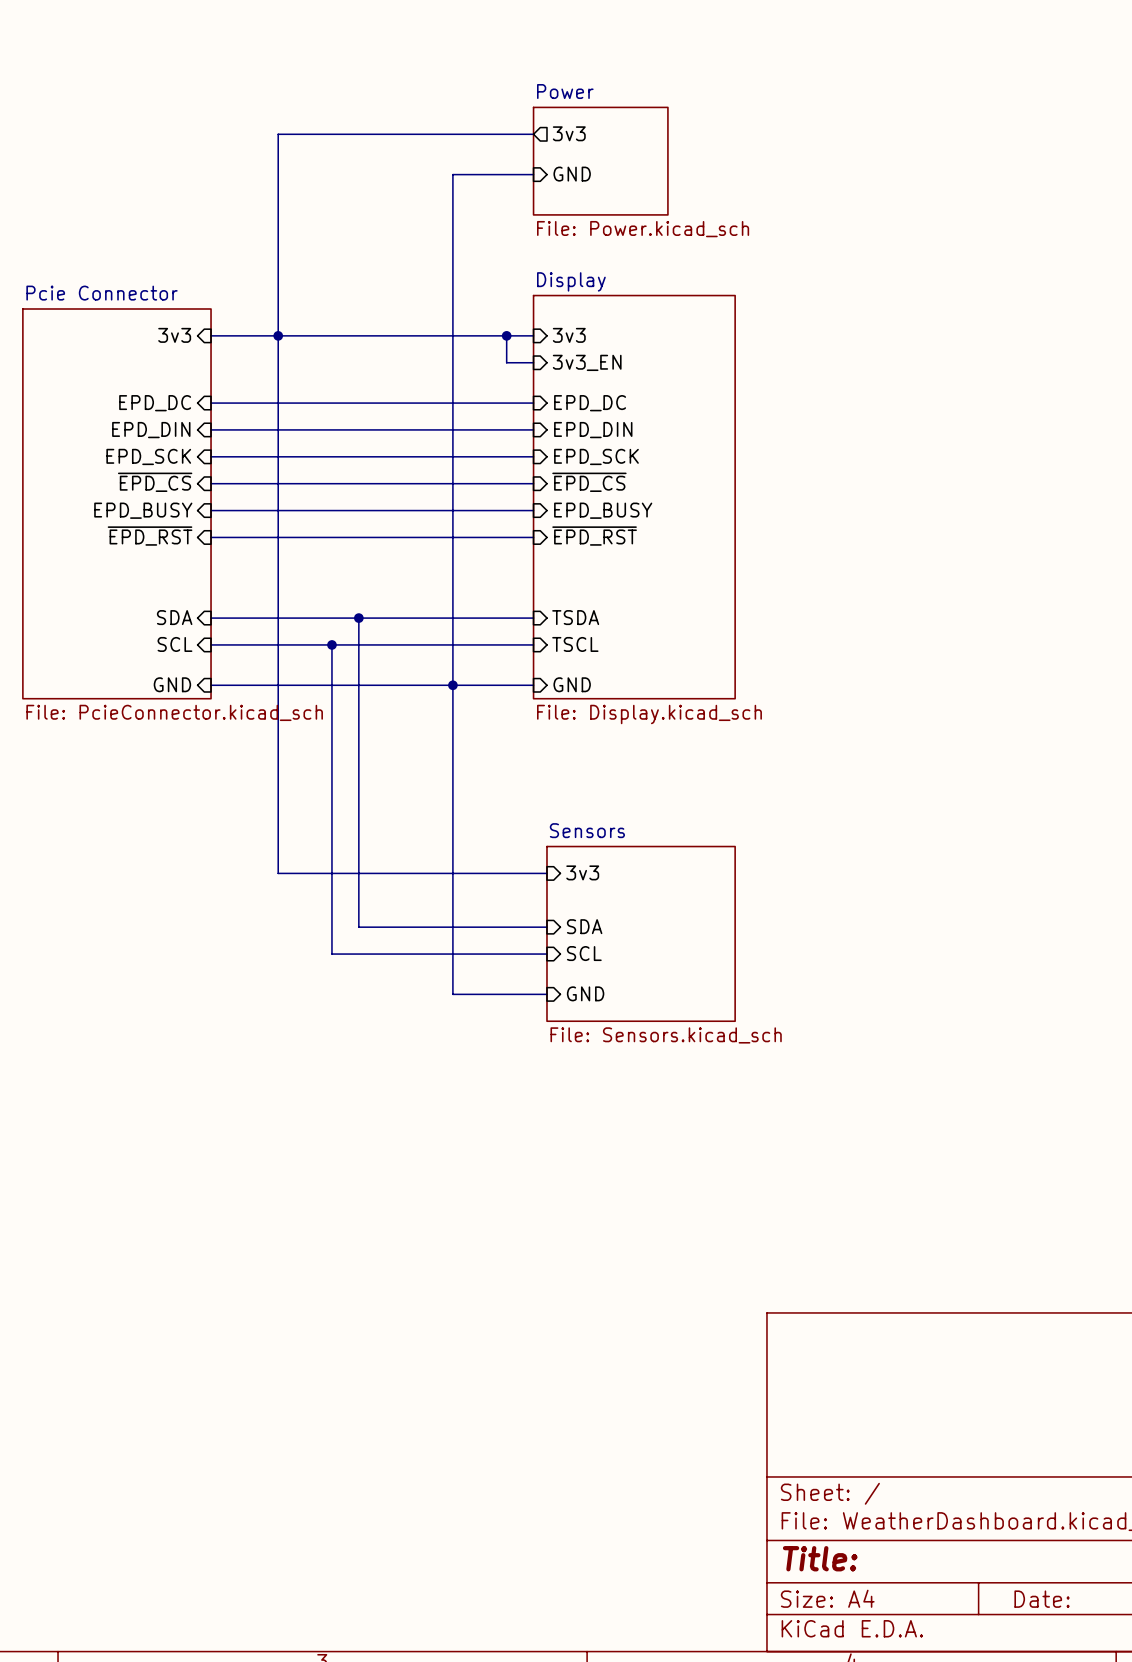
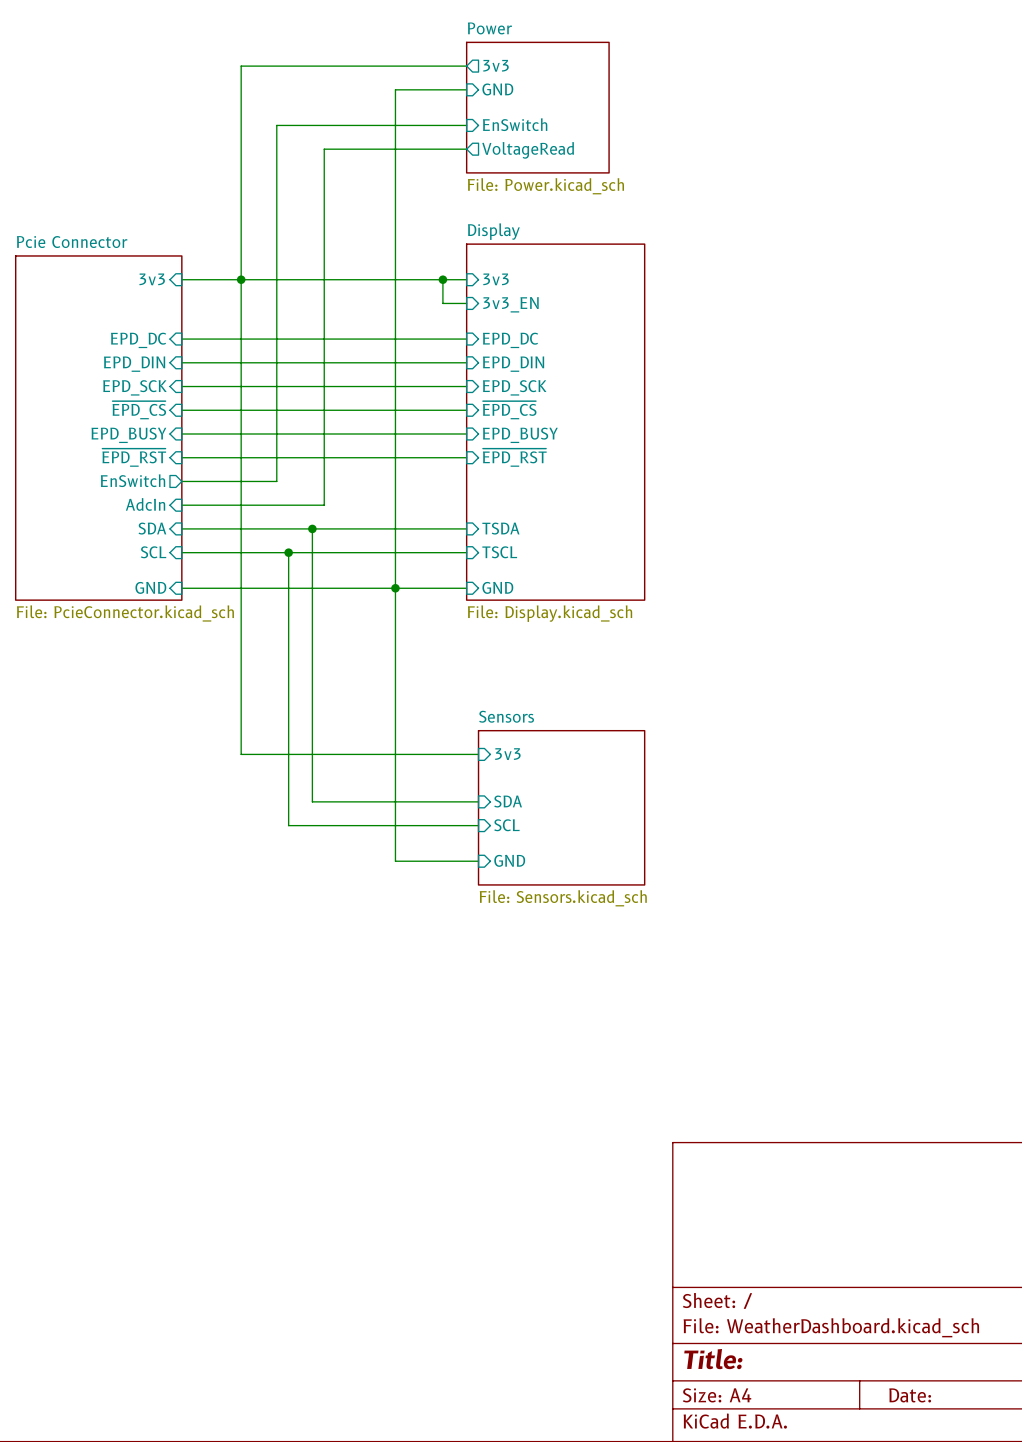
sheet pin position: 3v3 (569, 133) -> 3v3 (496, 65)
wire: (278, 134) (533, 134) -> (241, 101) (241, 66) (466, 66)
sheet Power: none -> File: Power.kicad_sch (537, 107)
sheet pin: none -> EnSwitch (515, 124)
wire: none -> (466, 125) (276, 125) (276, 481) (181, 481)
sheet Power: File: Power.kicad_sch (600, 161) -> none
wire: (452, 174) (533, 174) -> (395, 137) (395, 89) (466, 89)
sheet pin position: GND (572, 174) -> GND (497, 89)
wire: none -> (466, 149) (324, 149) (324, 505) (181, 505)
sheet pin: none -> VoltageRead (528, 150)
sheet pin: none -> EnSwitch (133, 480)
sheet pin: none -> AdcIn (145, 504)

